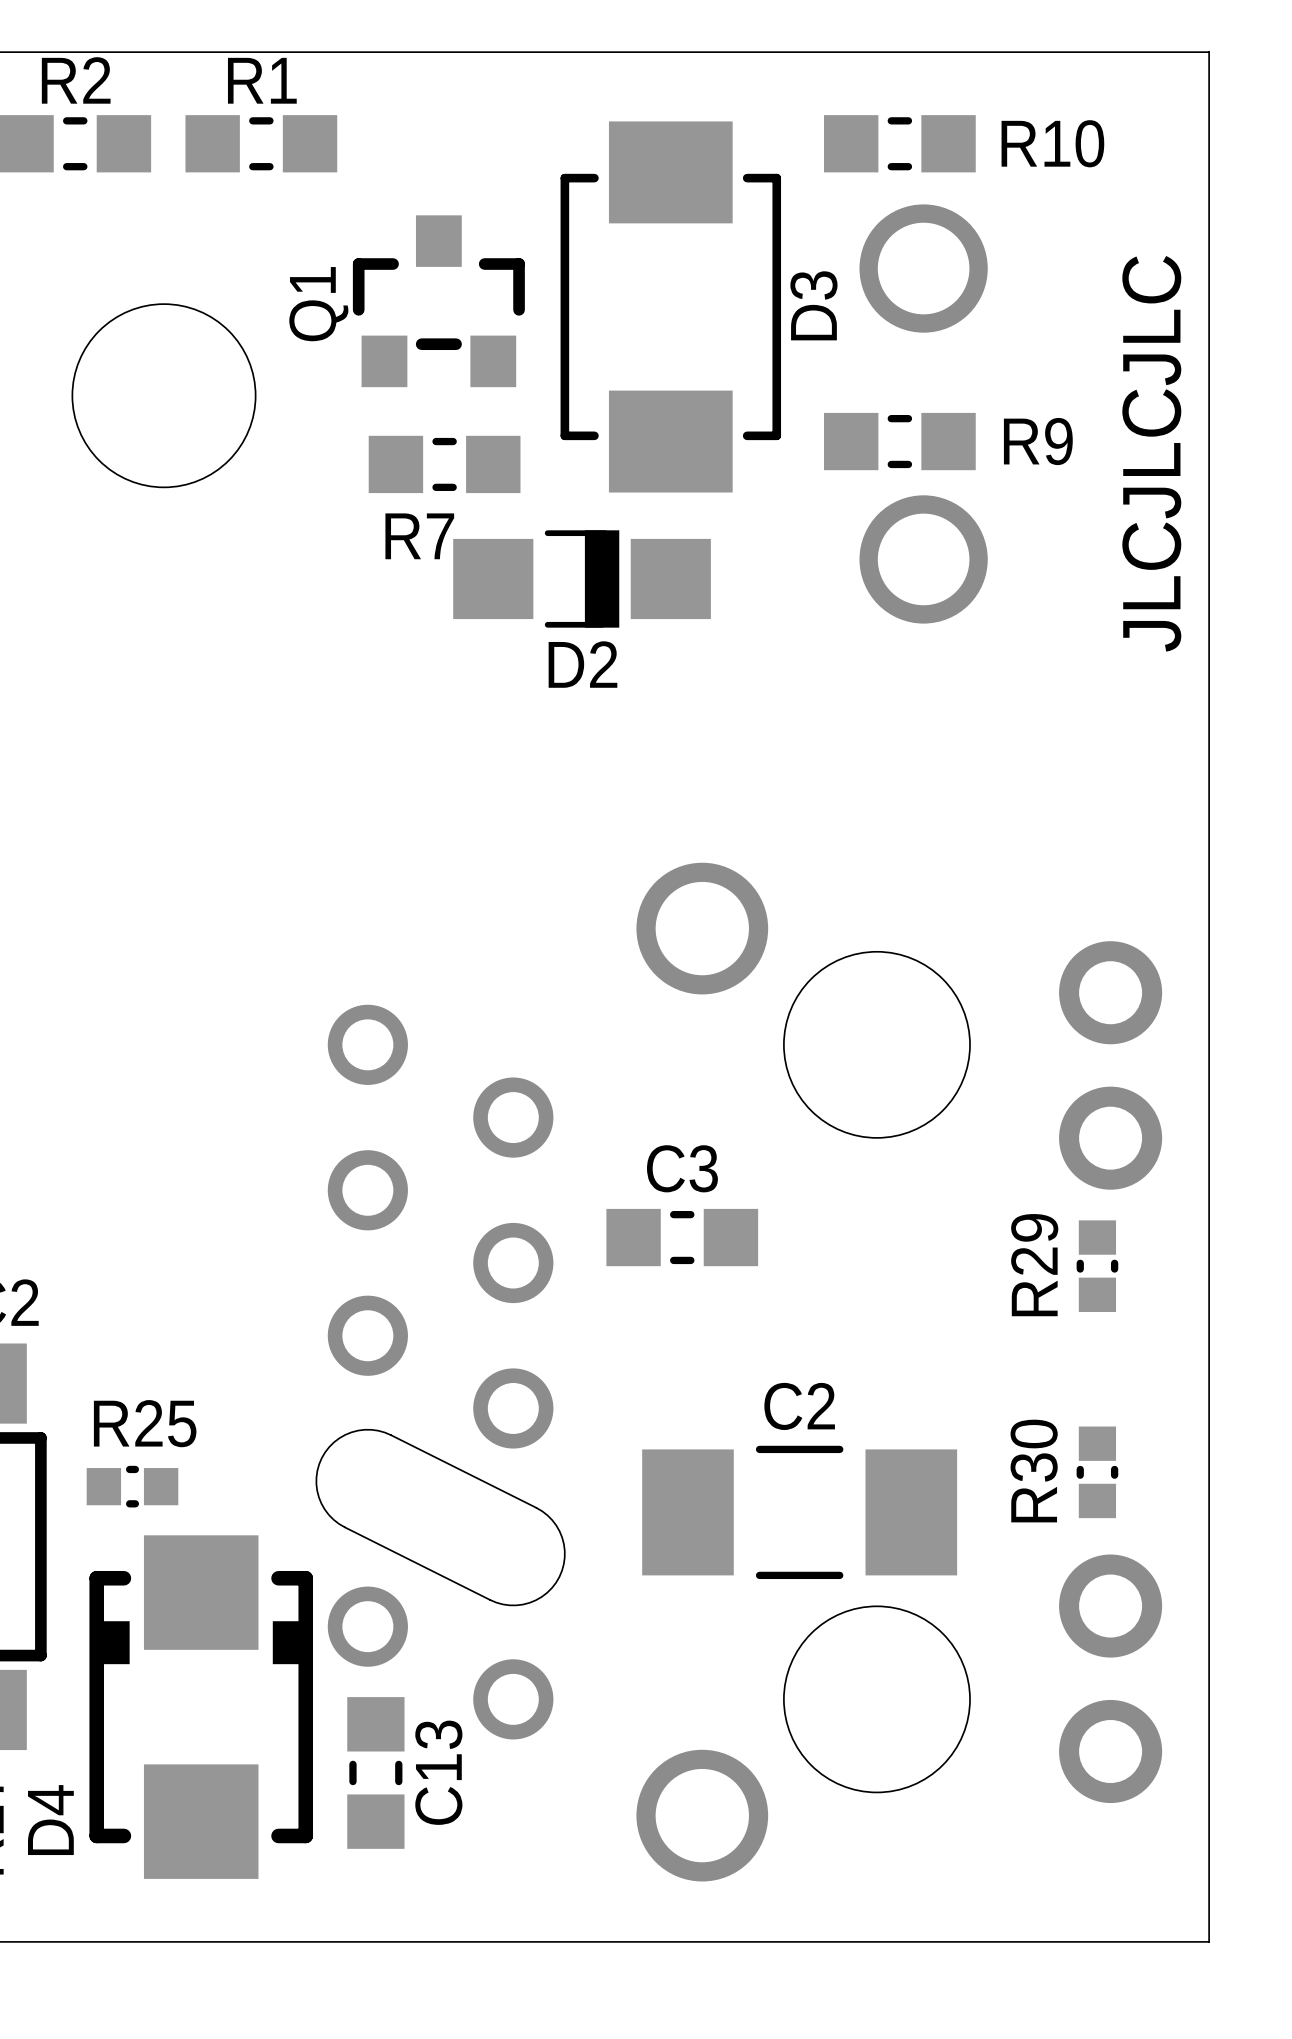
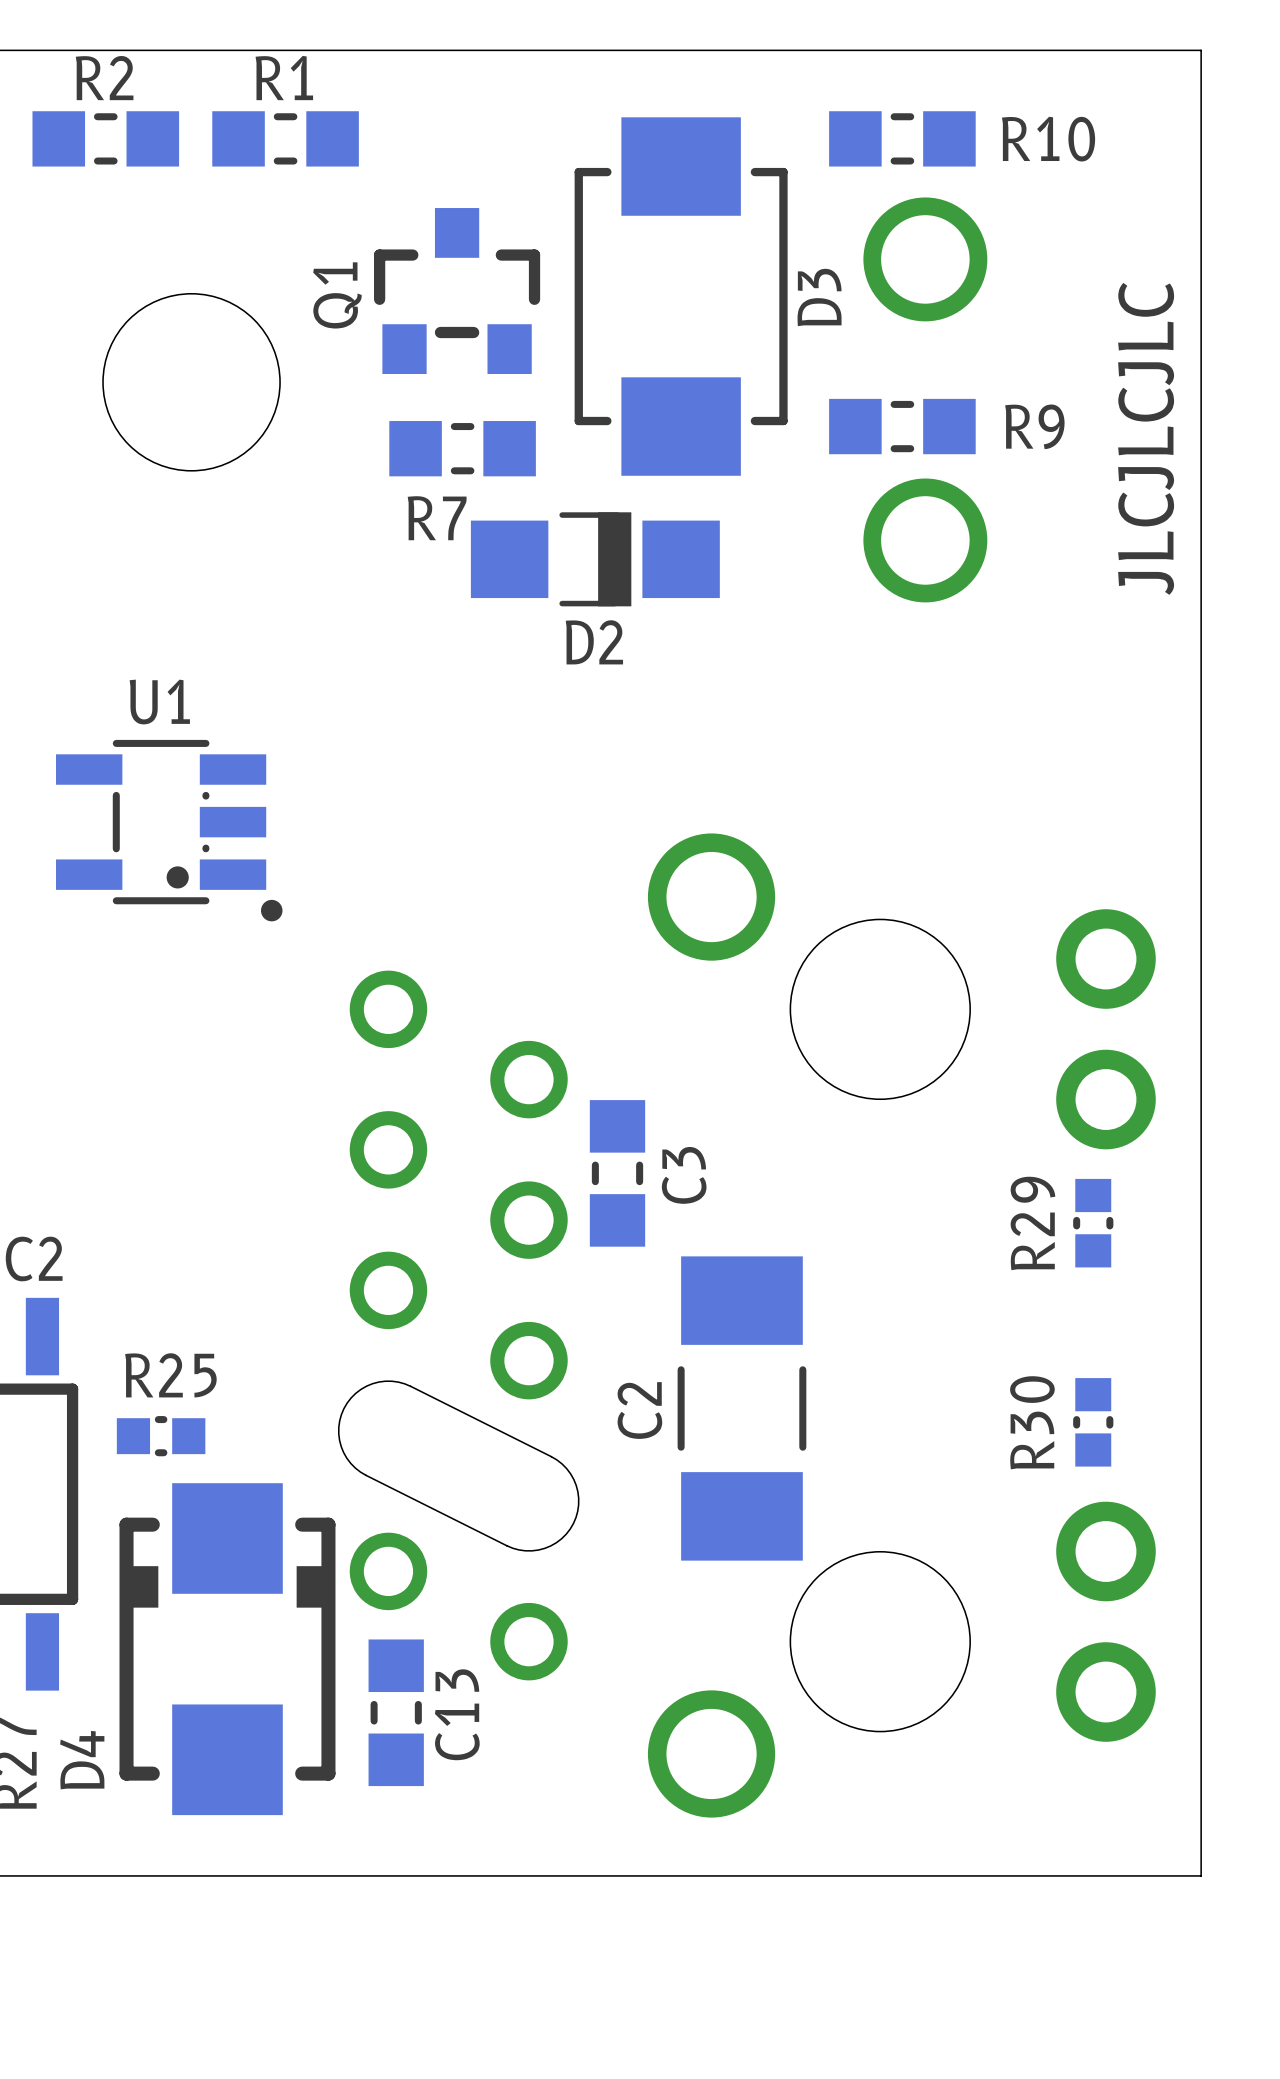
U1: none -> (169, 830)
C3 rotation: 0° (682, 1237) -> 90° clockwise (617, 1173)
C2 name position: C2 (799, 1406) -> C2 (639, 1410)
C2 rotation: 0° (799, 1512) -> 90° clockwise (741, 1408)

